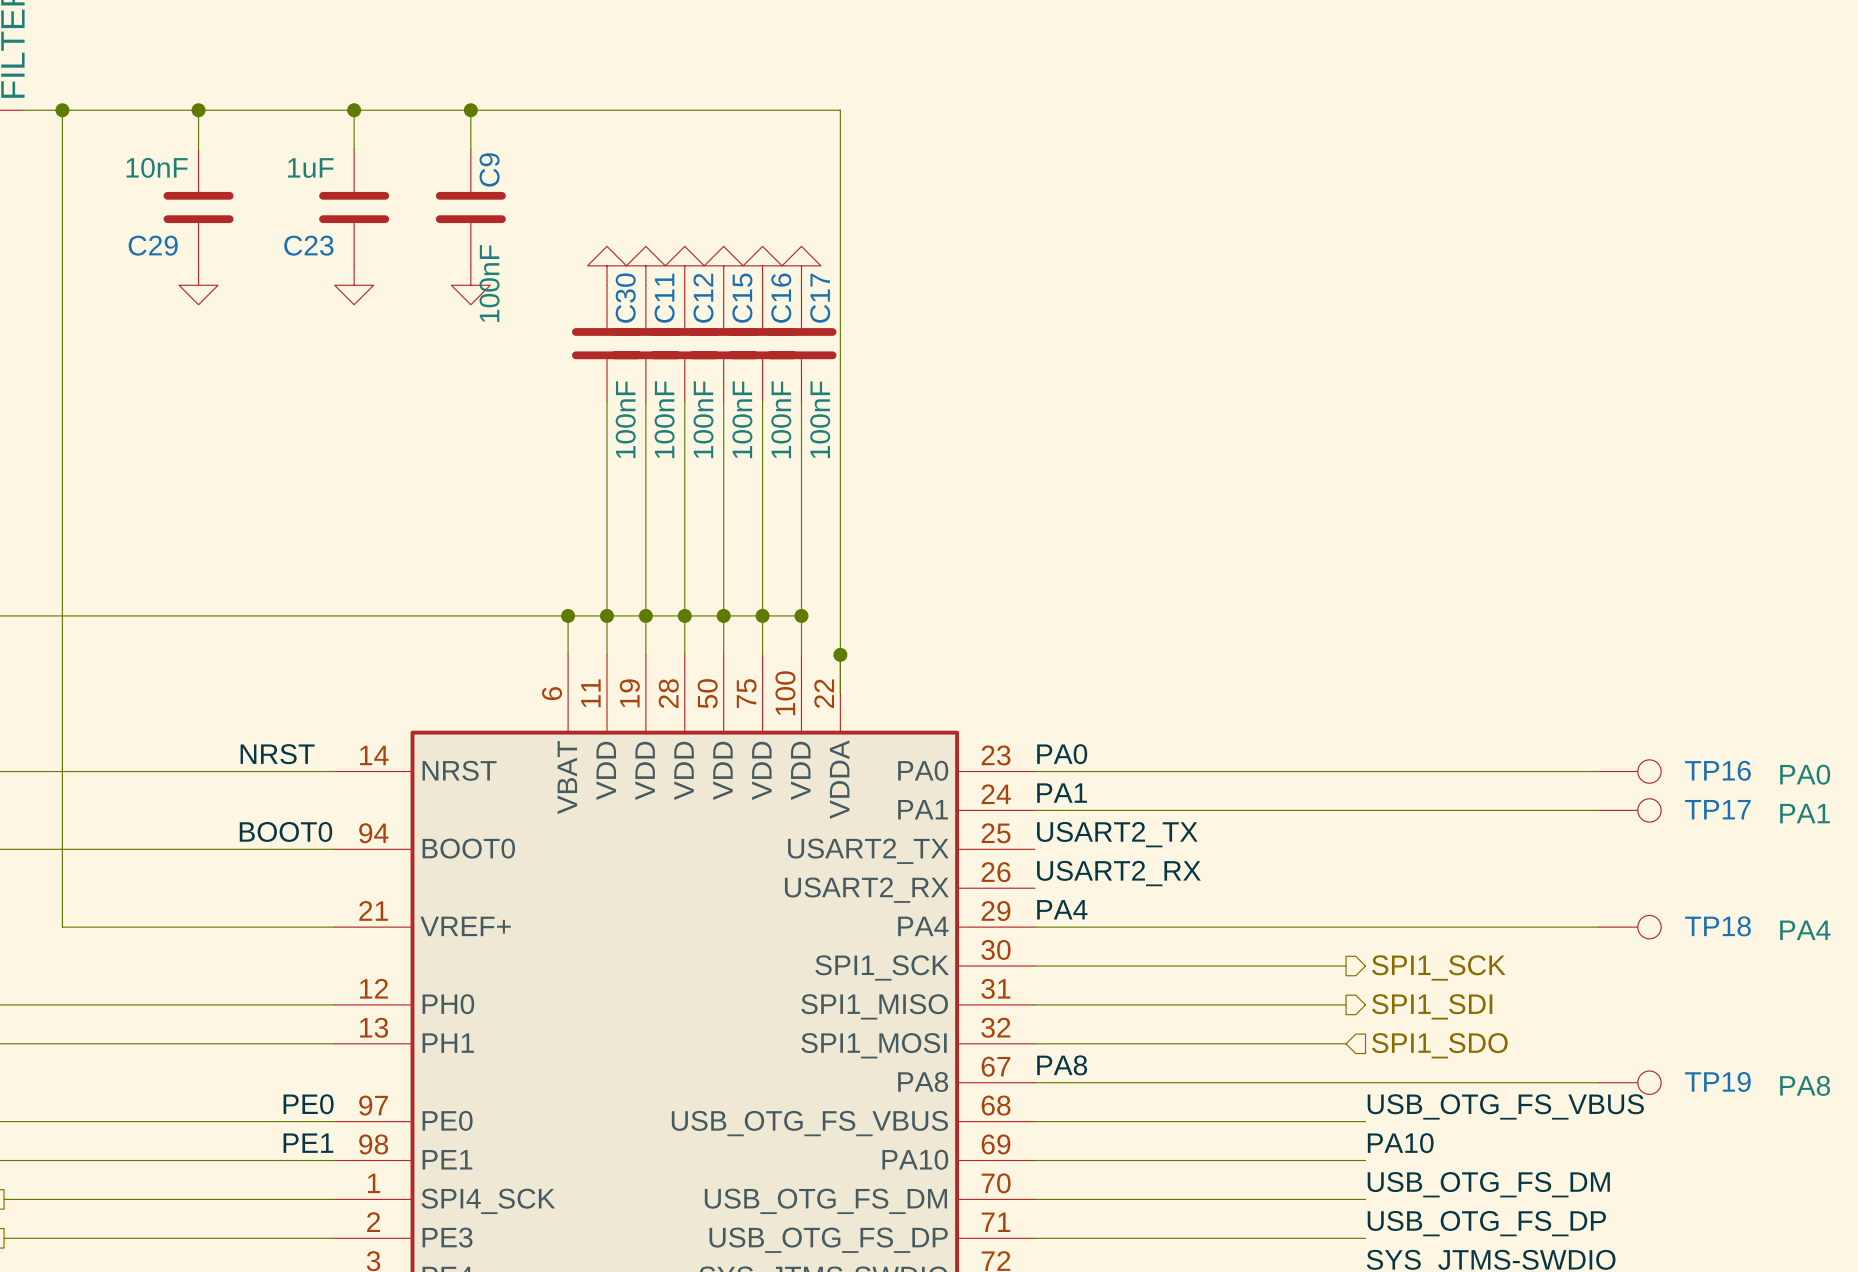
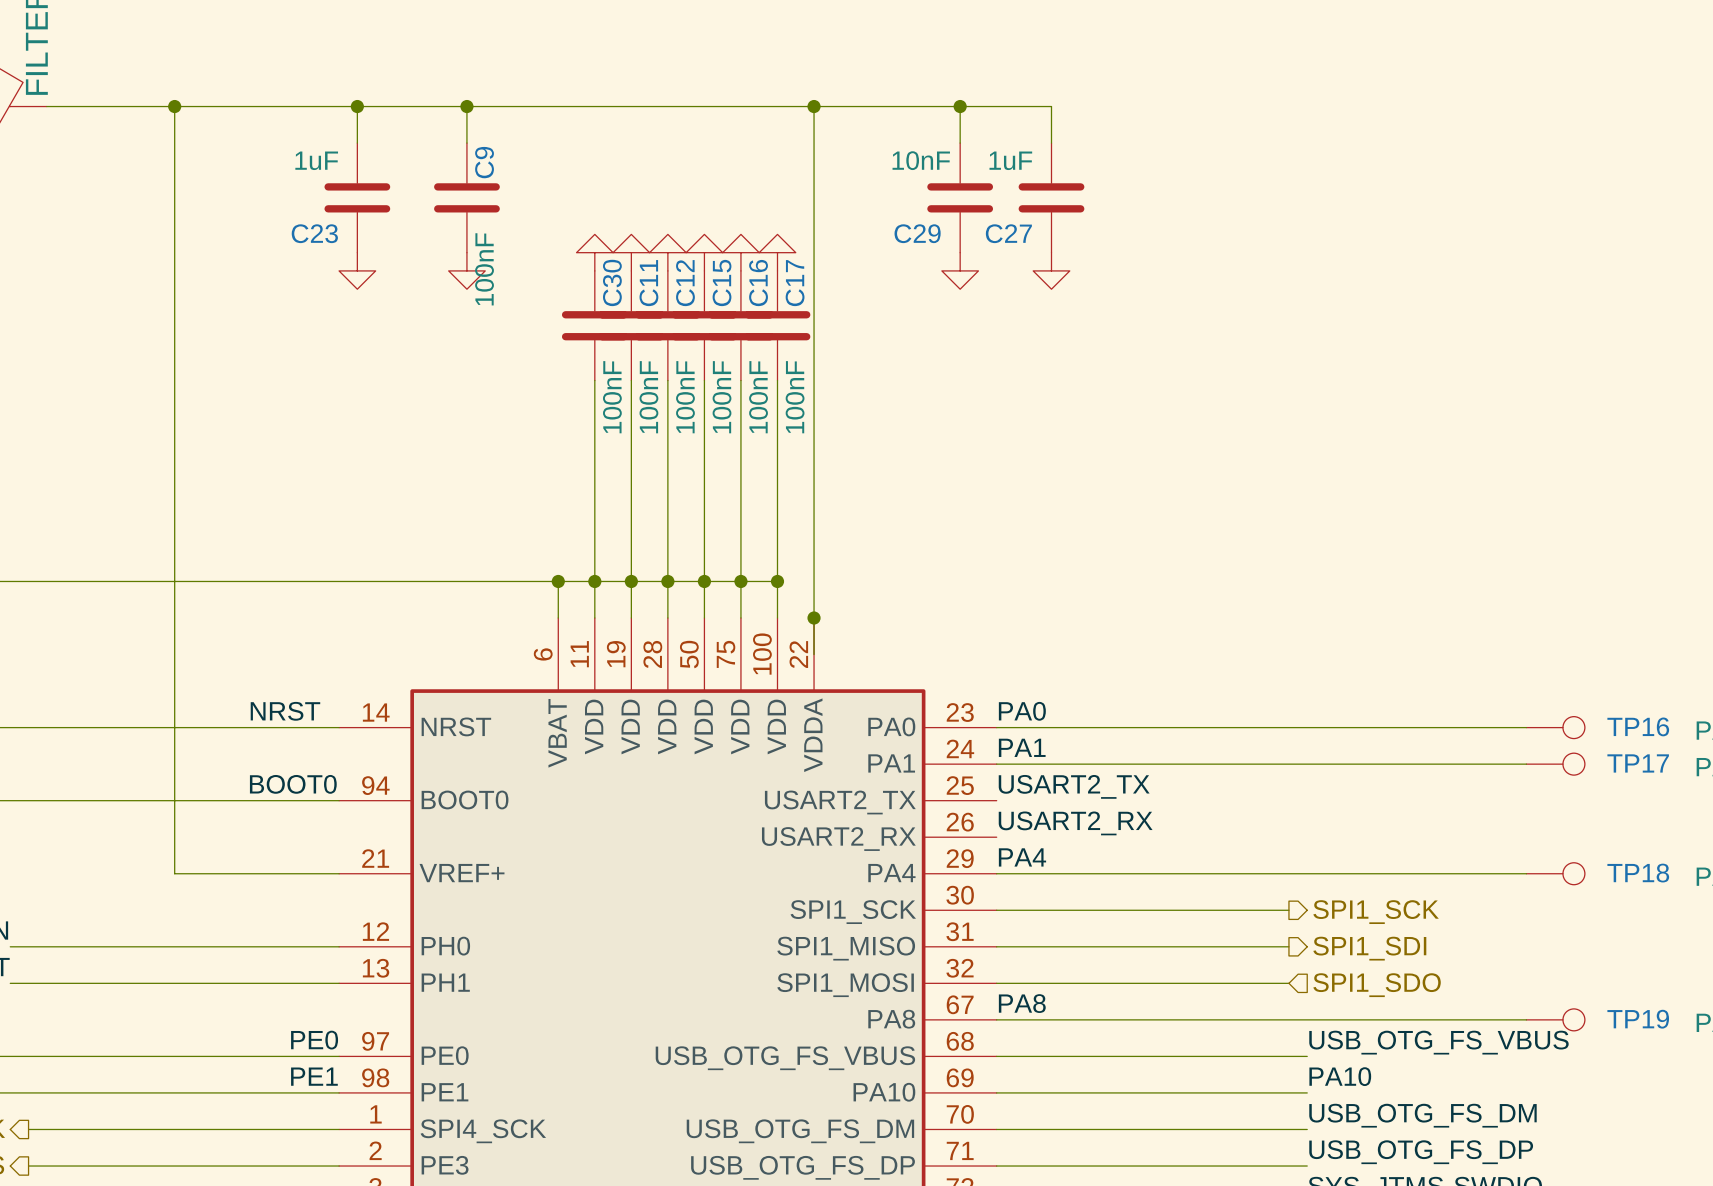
wire: (62, 110) (62, 927) (159, 927) -> (174, 106) (174, 873)
junction: (62, 110) -> none
wire: (198, 110) (198, 149) -> none
junction position: (198, 110) -> (174, 106)
wire: none -> (814, 106) (1051, 106) (1051, 143)
junction: none -> (814, 106)
wire: none -> (960, 106) (960, 143)
junction: none -> (960, 106)
C29 position: (198, 207) -> (960, 197)
C27: none -> 1uF (1051, 197)
power symbol: (198, 285) -> none
power symbol: none -> (960, 270)
power symbol: none -> (1051, 270)

